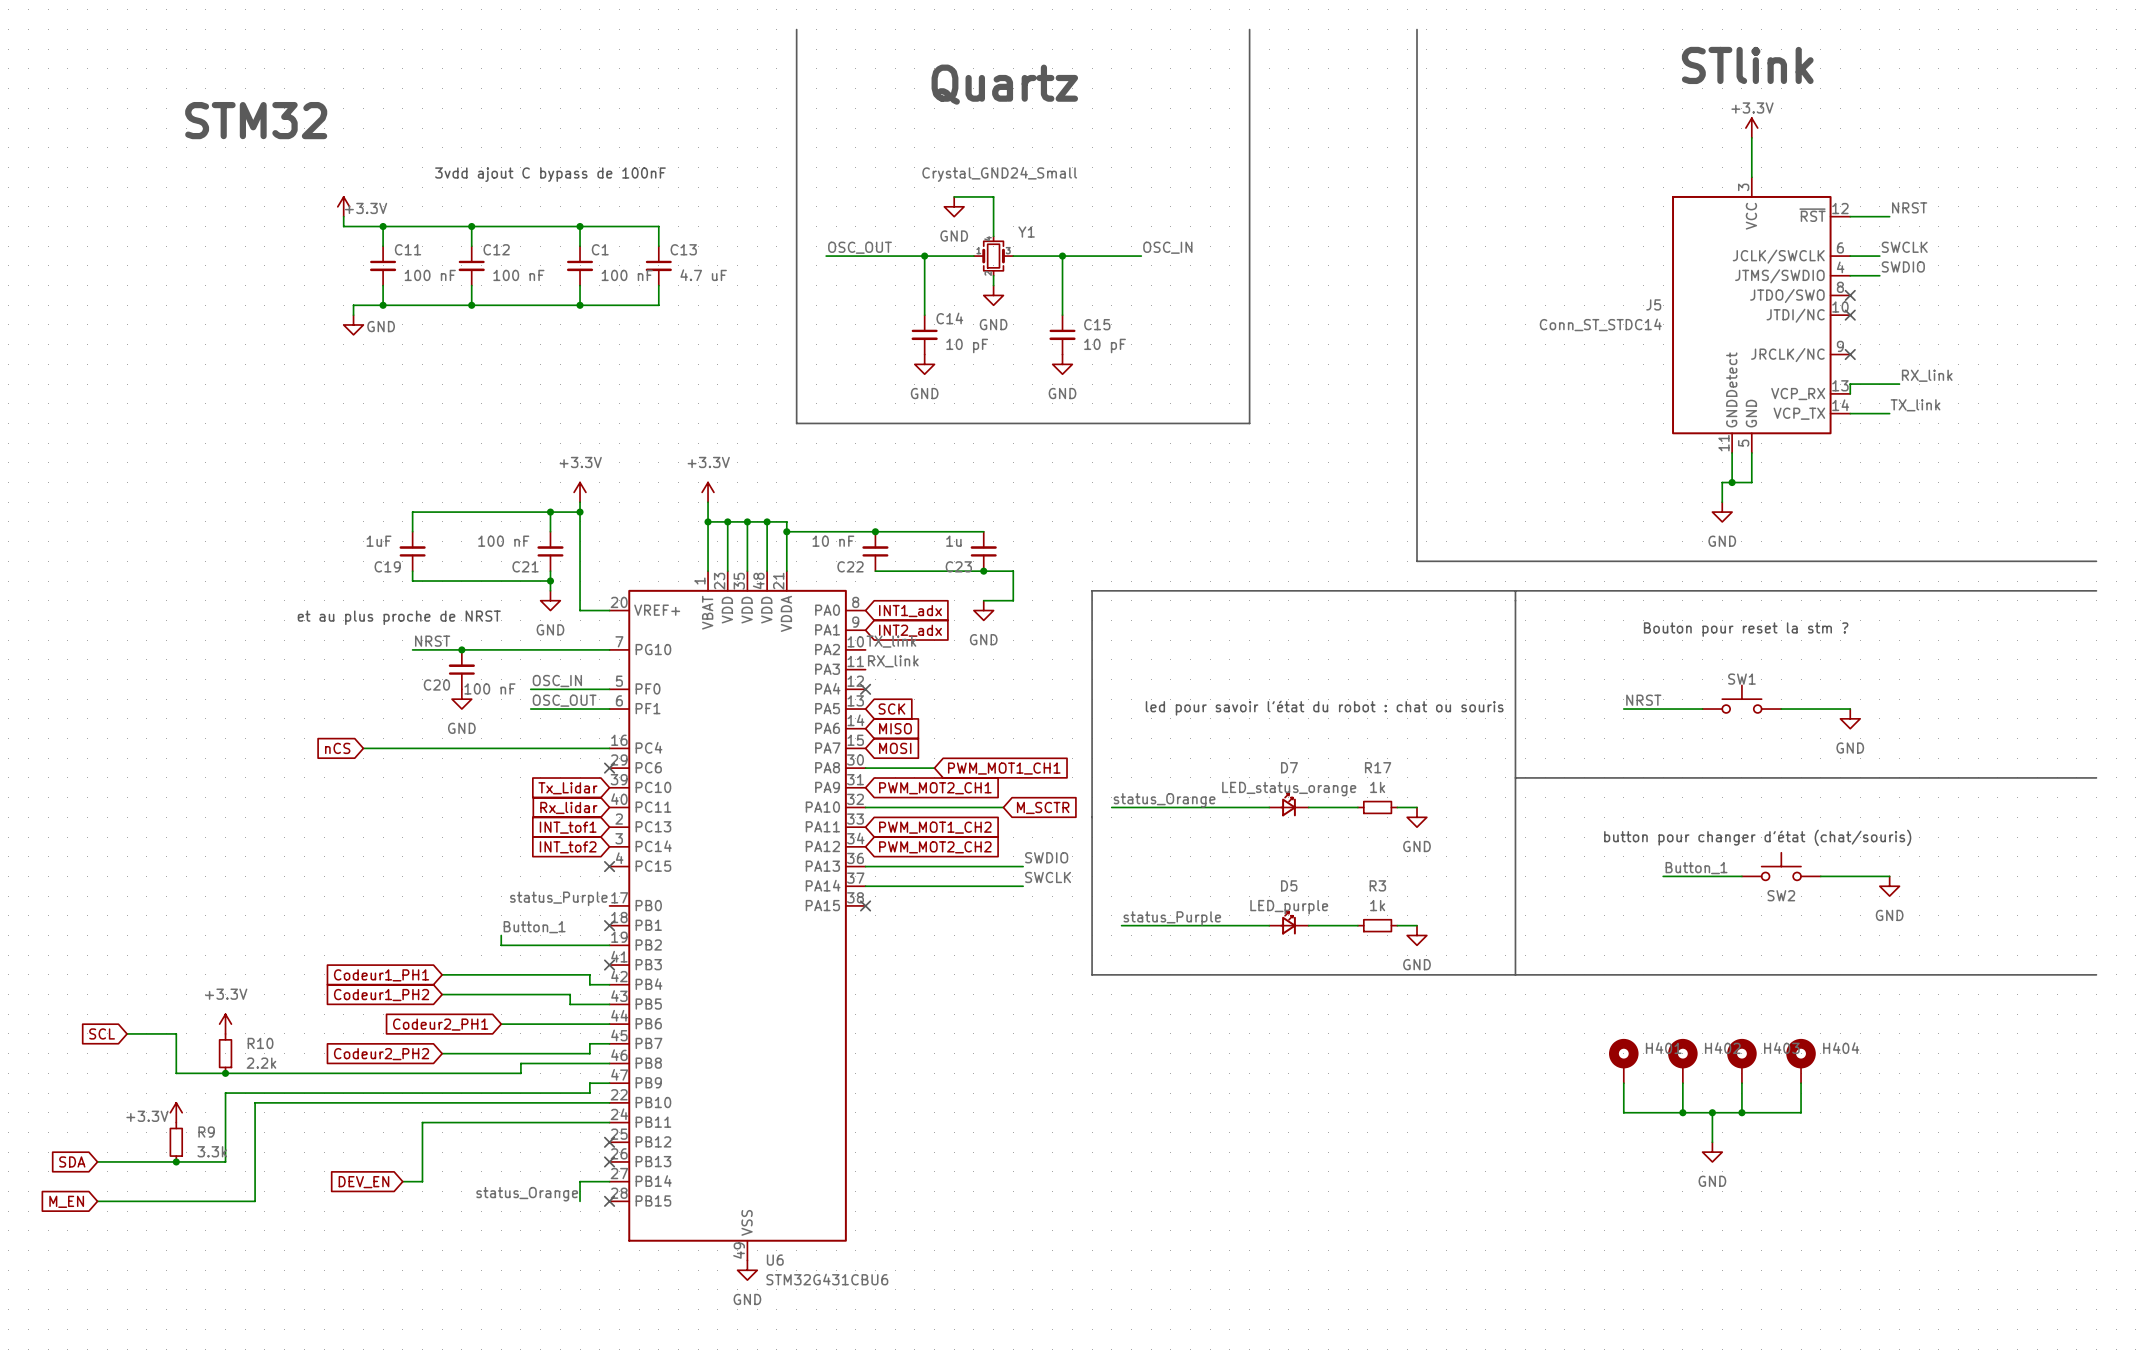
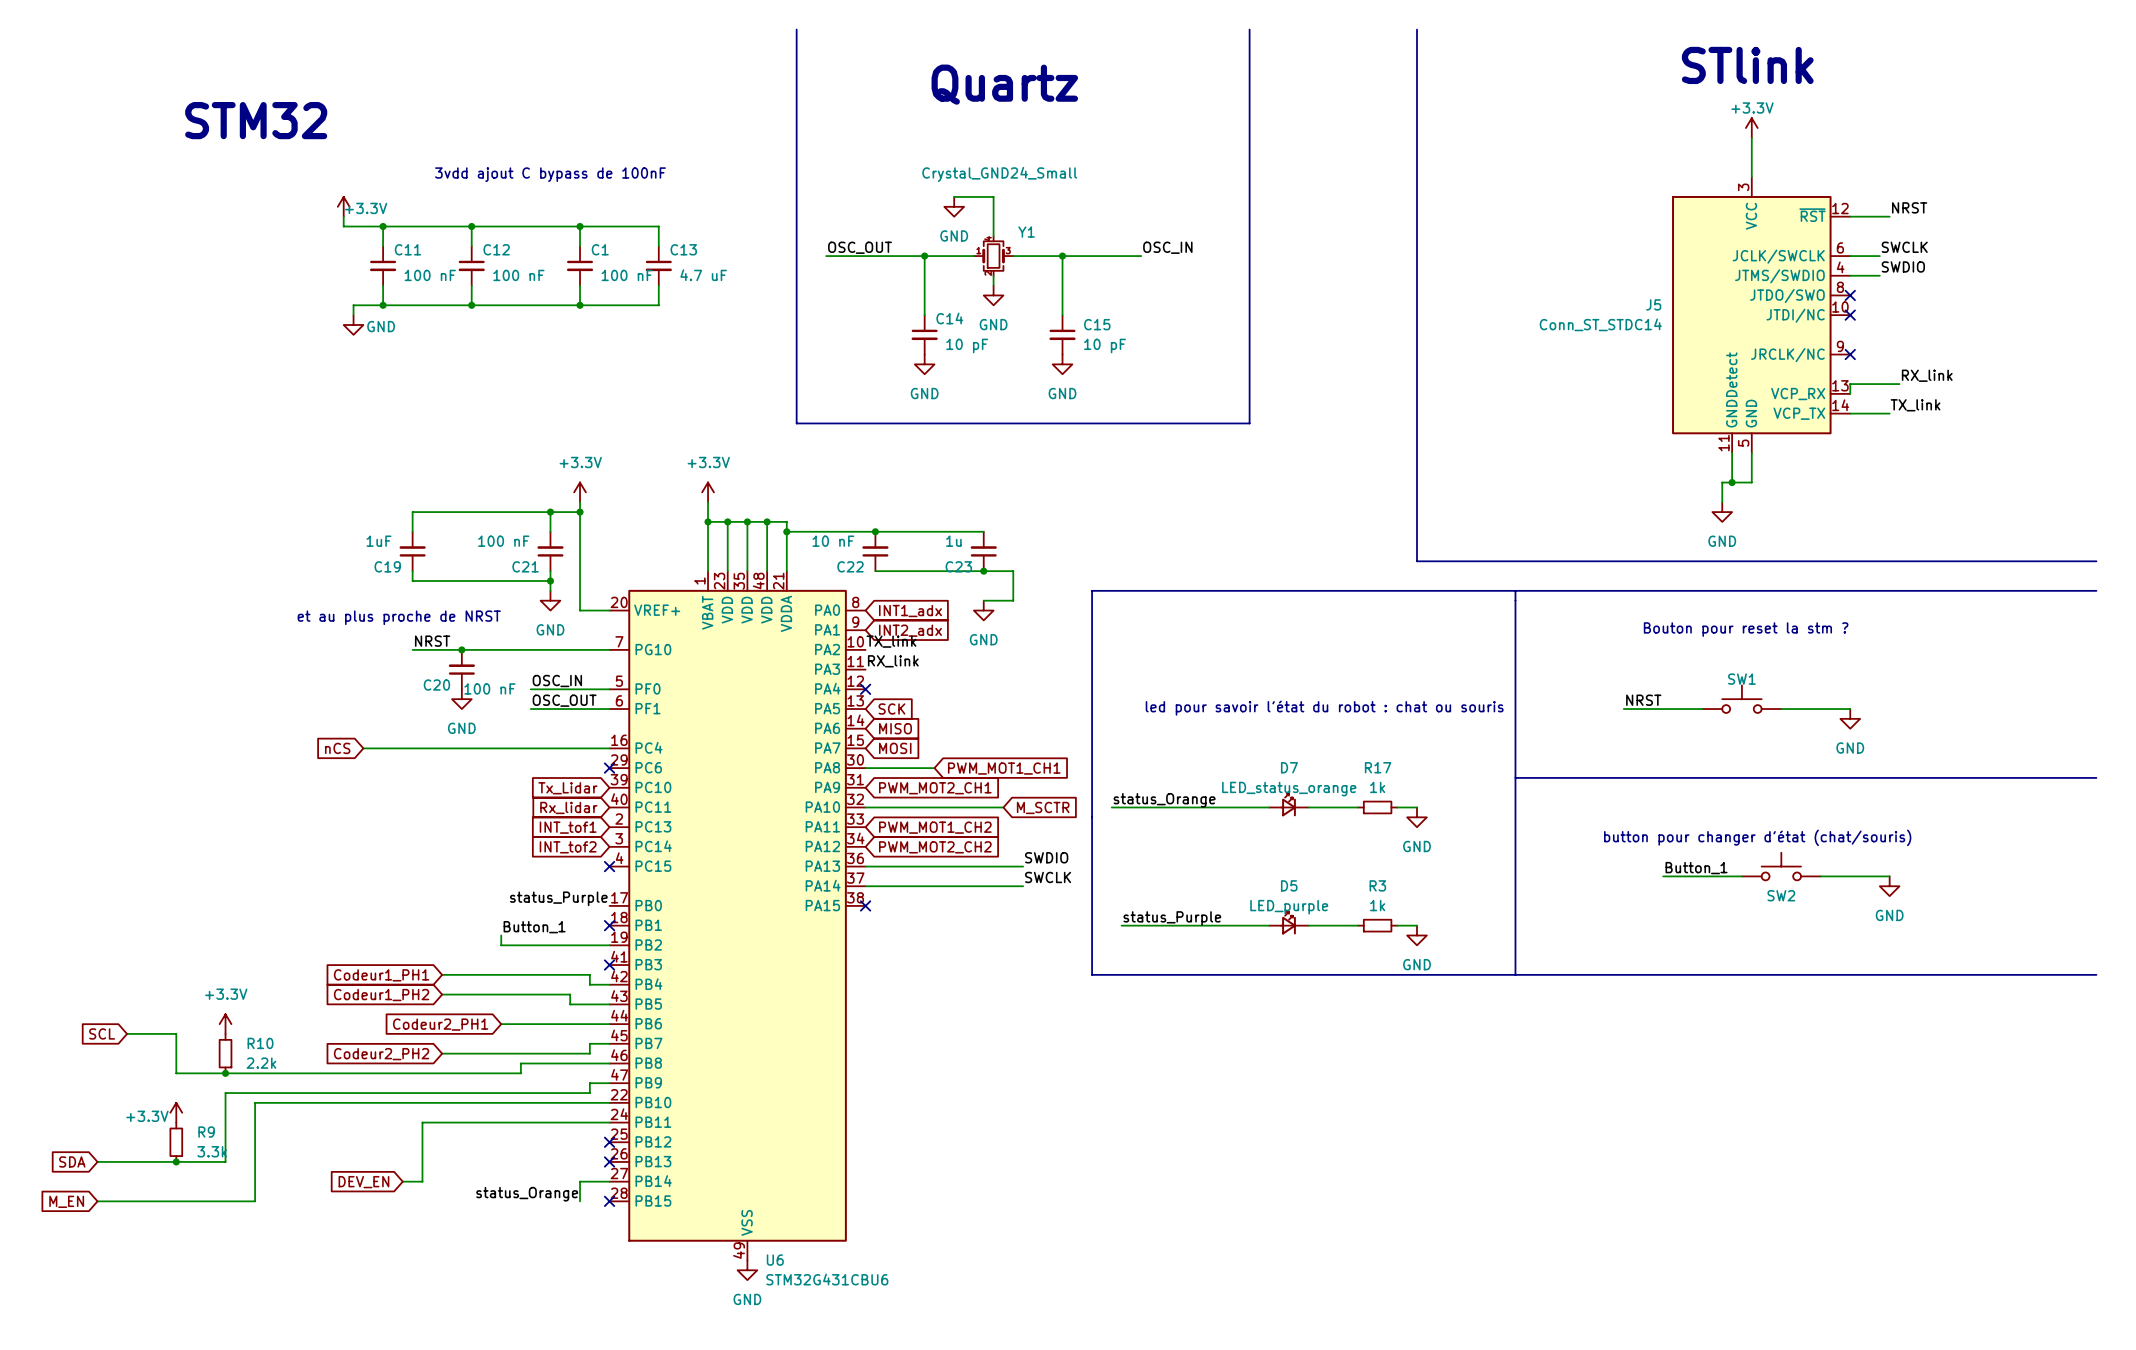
H401: (1623, 1061) -> none
H402: (1682, 1061) -> none
H403: (1741, 1061) -> none
H404: (1801, 1061) -> none
wire: (1623, 1083) (1623, 1112) (1801, 1112) (1801, 1083) -> none
wire: (1682, 1083) (1682, 1112) -> none
wire: (1741, 1083) (1741, 1112) -> none
junction: (1682, 1112) -> none
wire: (1712, 1112) (1712, 1142) -> none
junction: (1712, 1112) -> none
junction: (1741, 1112) -> none
power symbol: GND (1712, 1152) -> none

